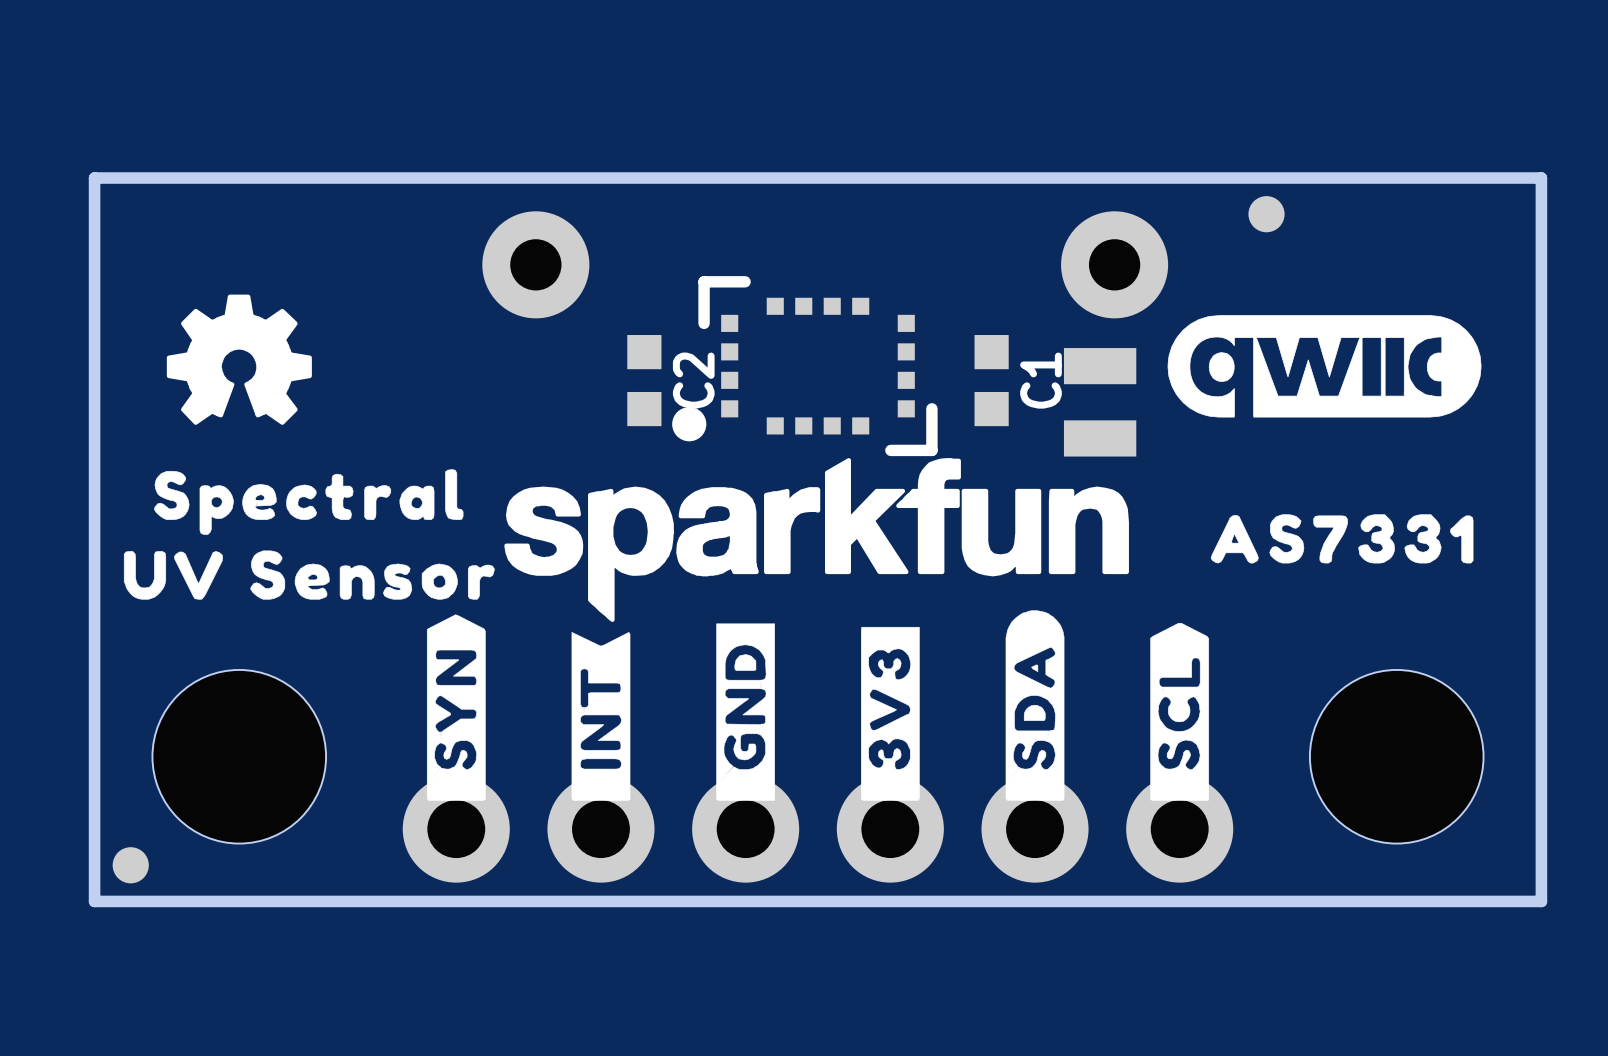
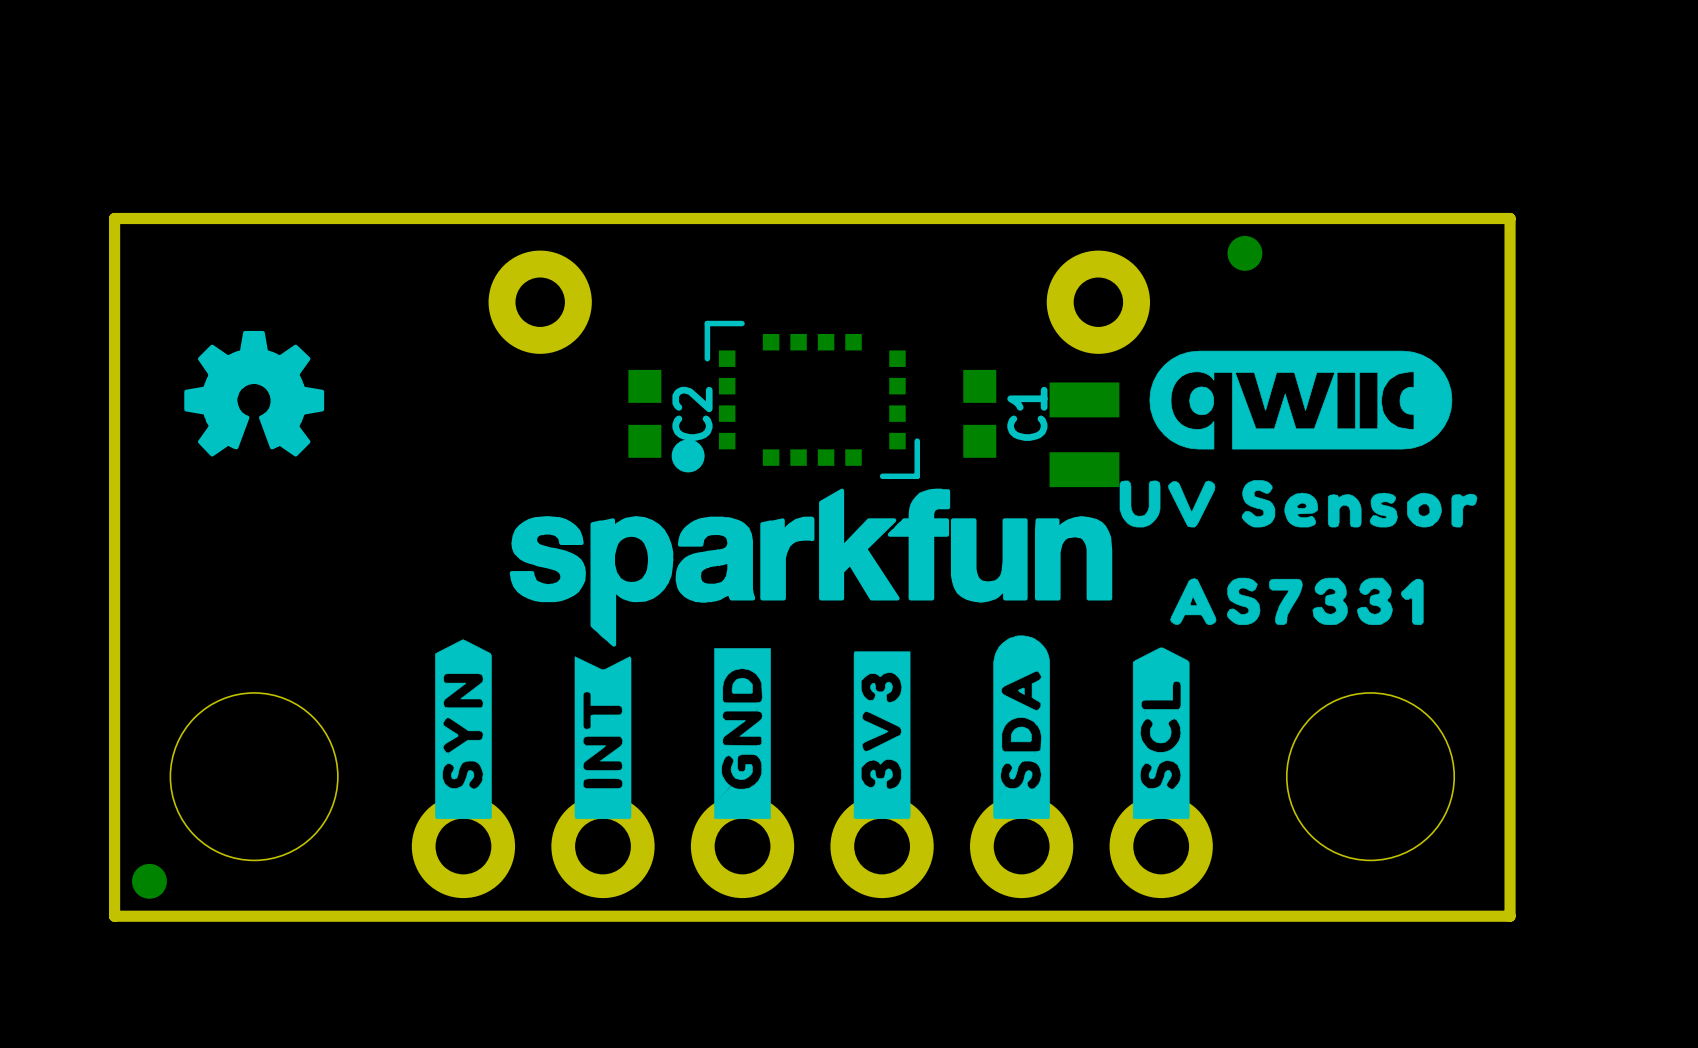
part footprint: [672, 276, 938, 457] -> [671, 320, 921, 480]
drawing: [154, 469, 464, 535] -> none
drawing position: (1342, 538) -> (1296, 601)
drawing position: (309, 575) -> (1298, 503)

